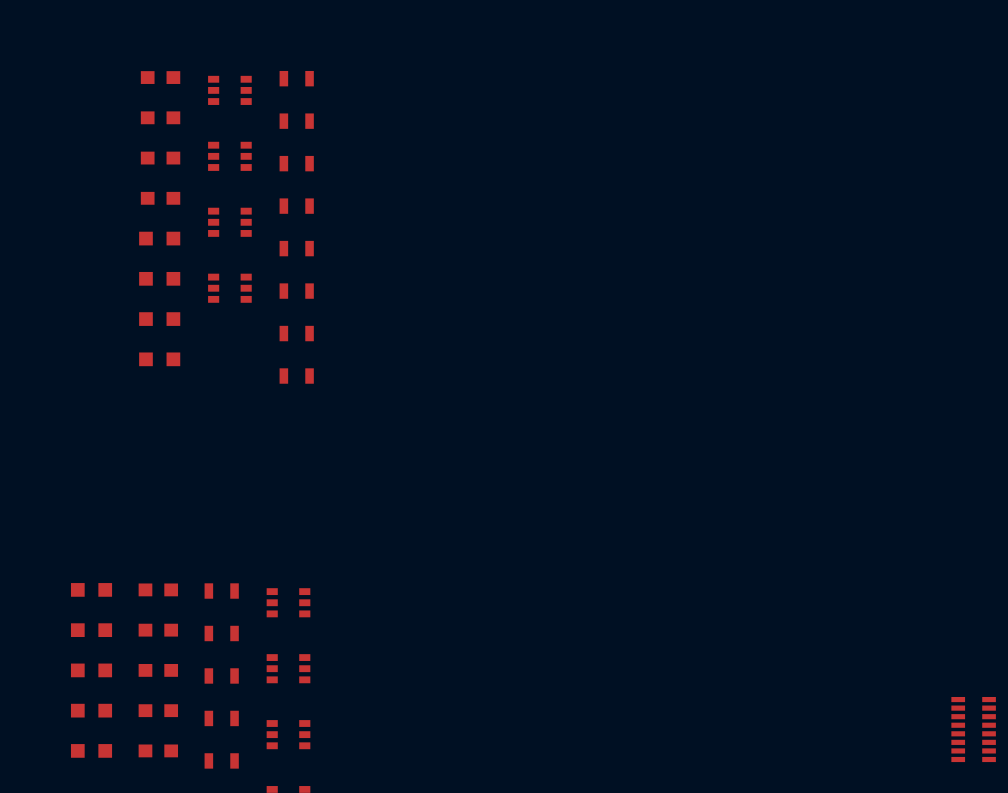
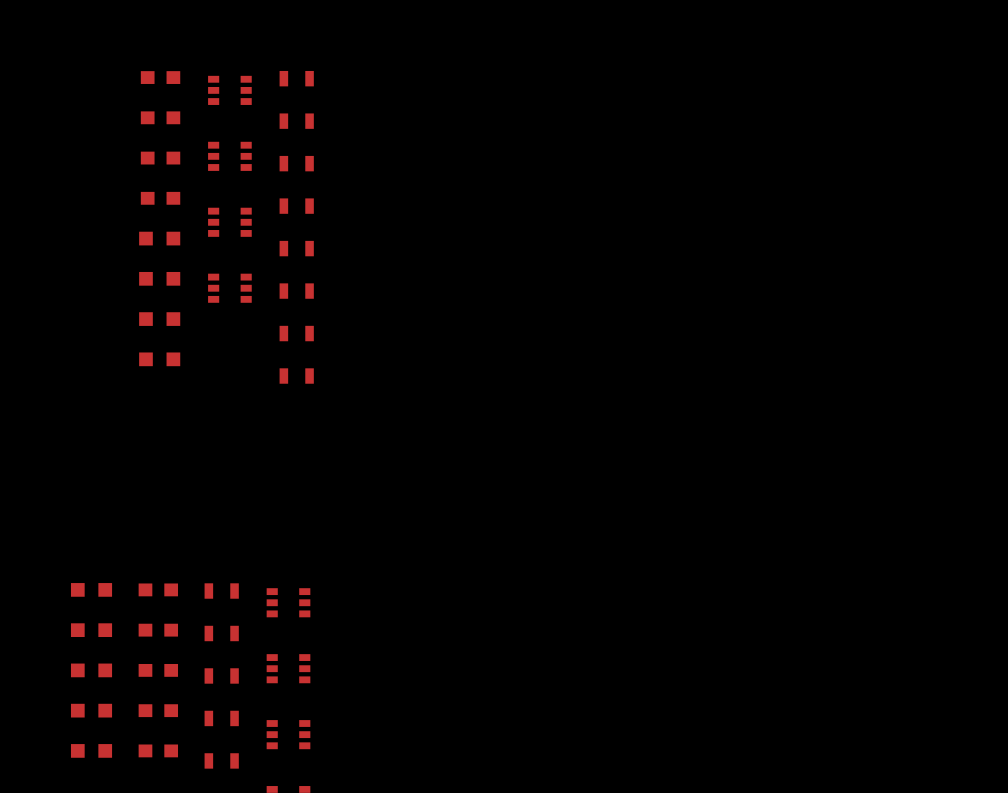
part: (973, 729) -> none

